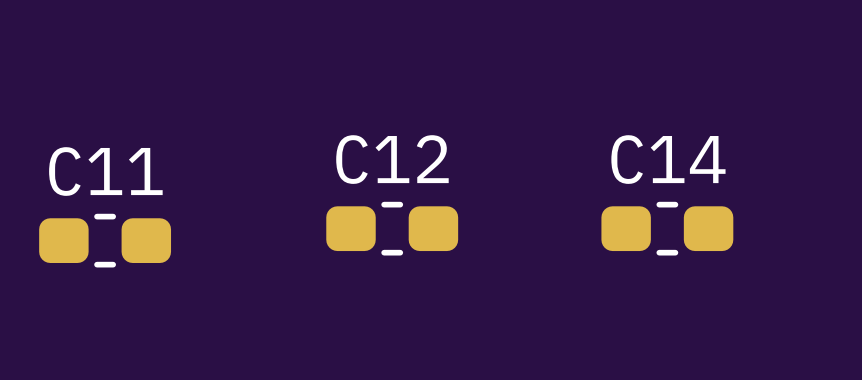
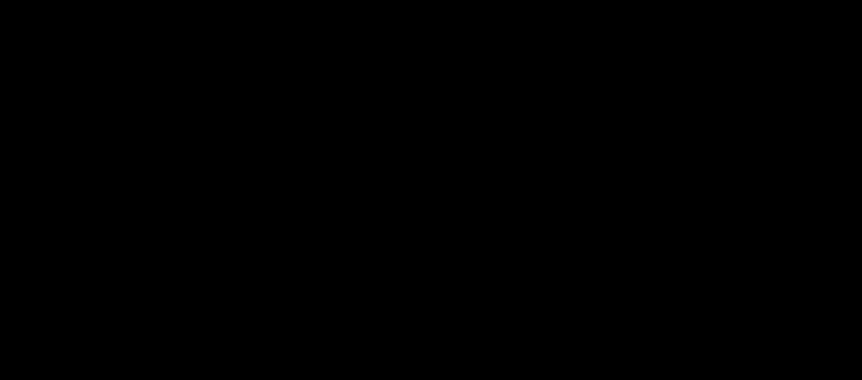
C12: (392, 228) -> none
C14: (667, 228) -> none
C11: (105, 240) -> none

